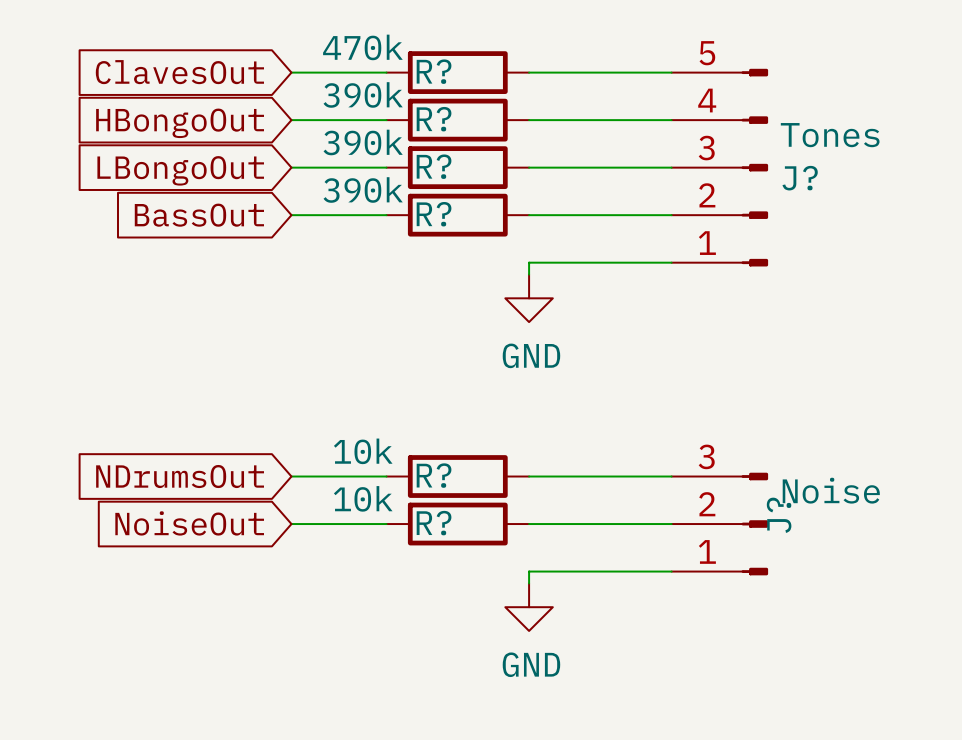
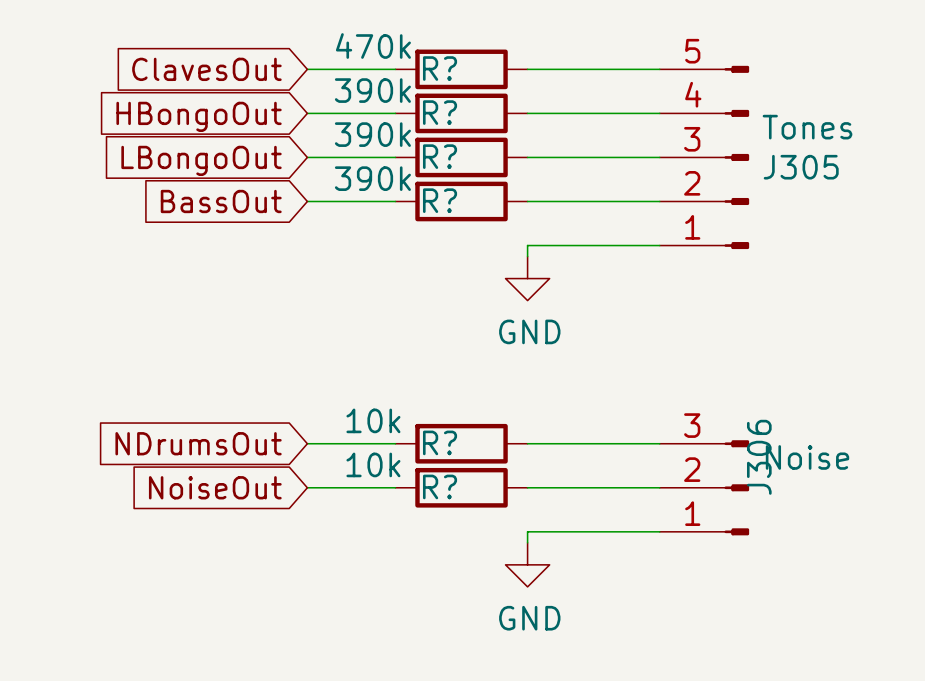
J? name: J? (800, 178) -> J305 (801, 167)
J? name: J? (779, 515) -> J306 (759, 457)

